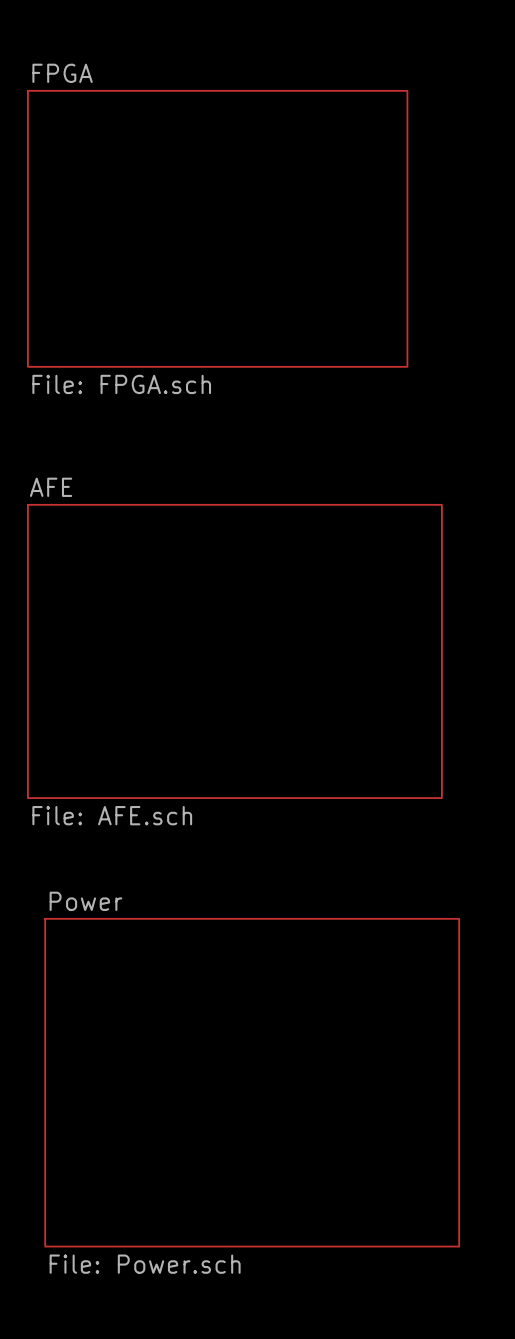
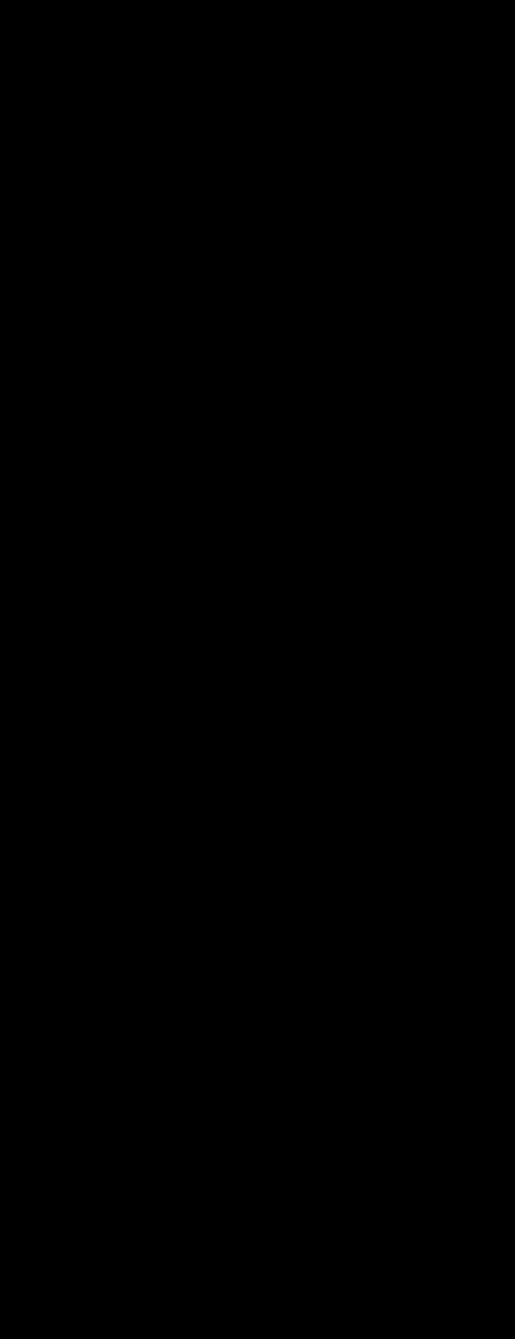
sheet FPGA: File: FPGA.sch (217, 228) -> none
sheet AFE: File: AFE.sch (234, 651) -> none
sheet Power: File: Power.sch (252, 1082) -> none

